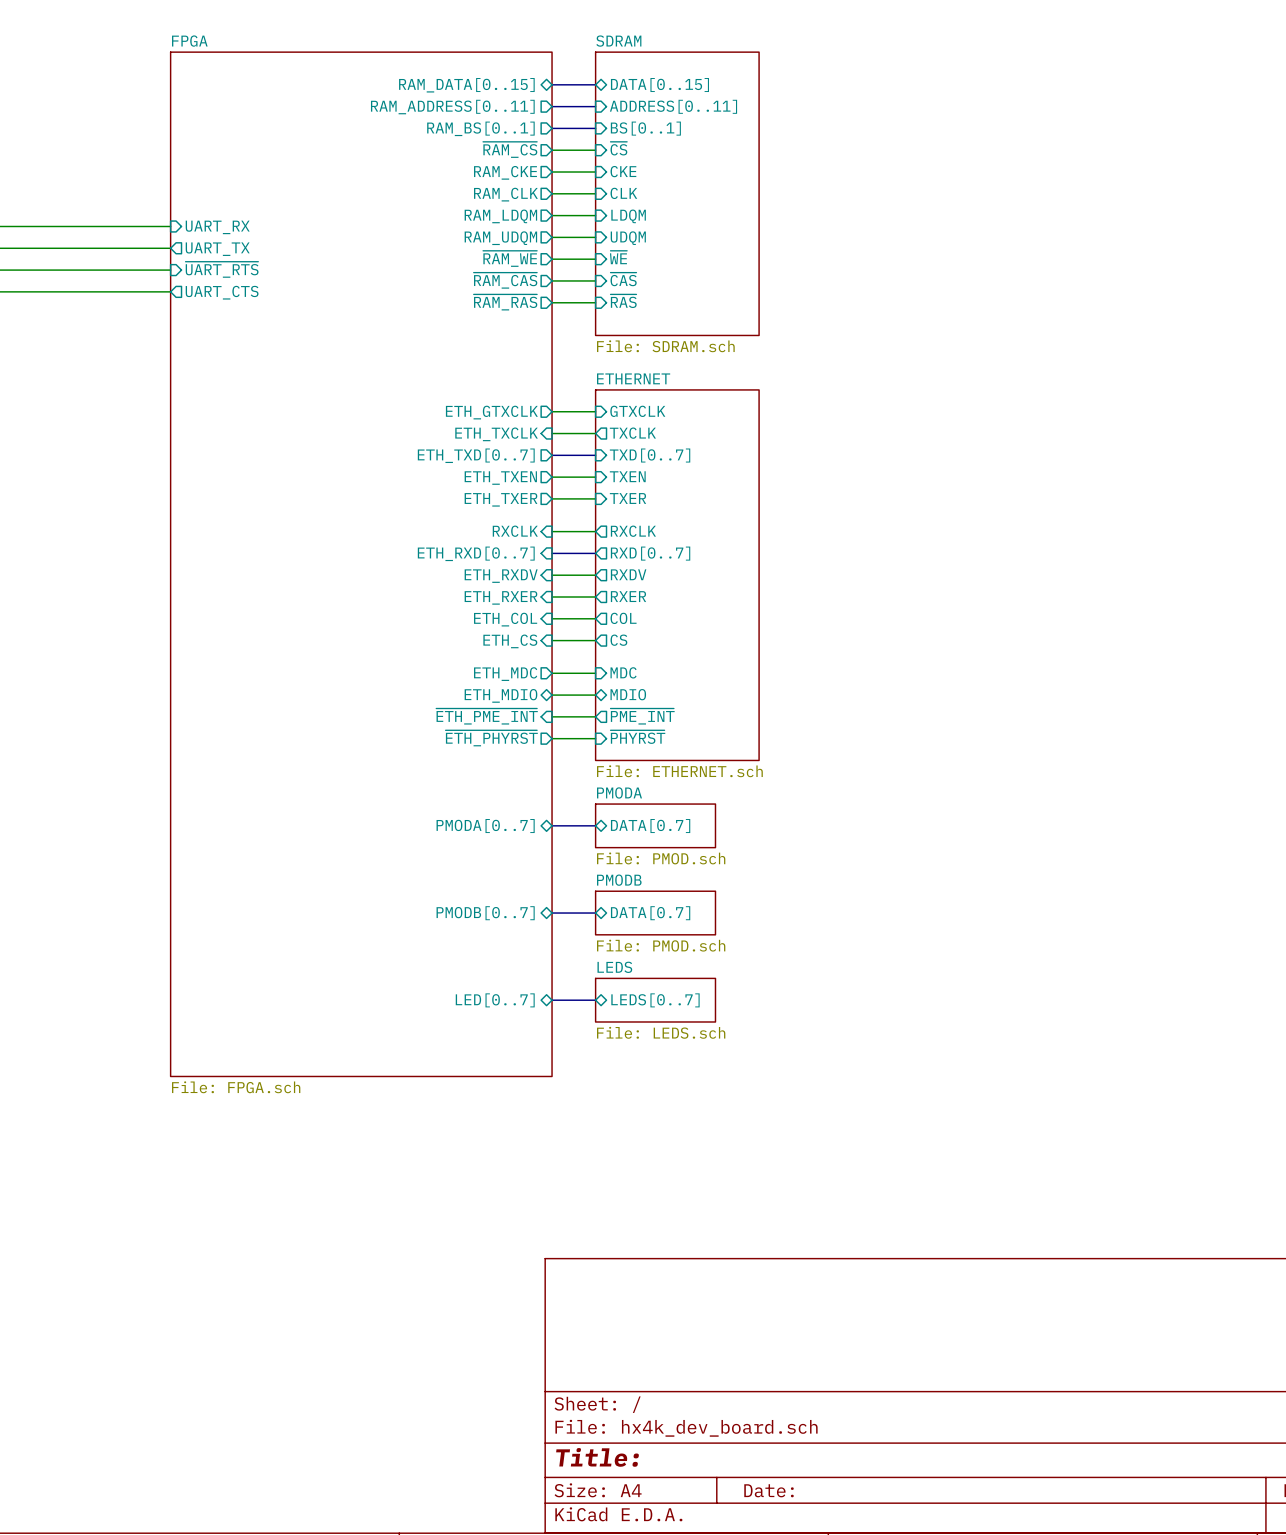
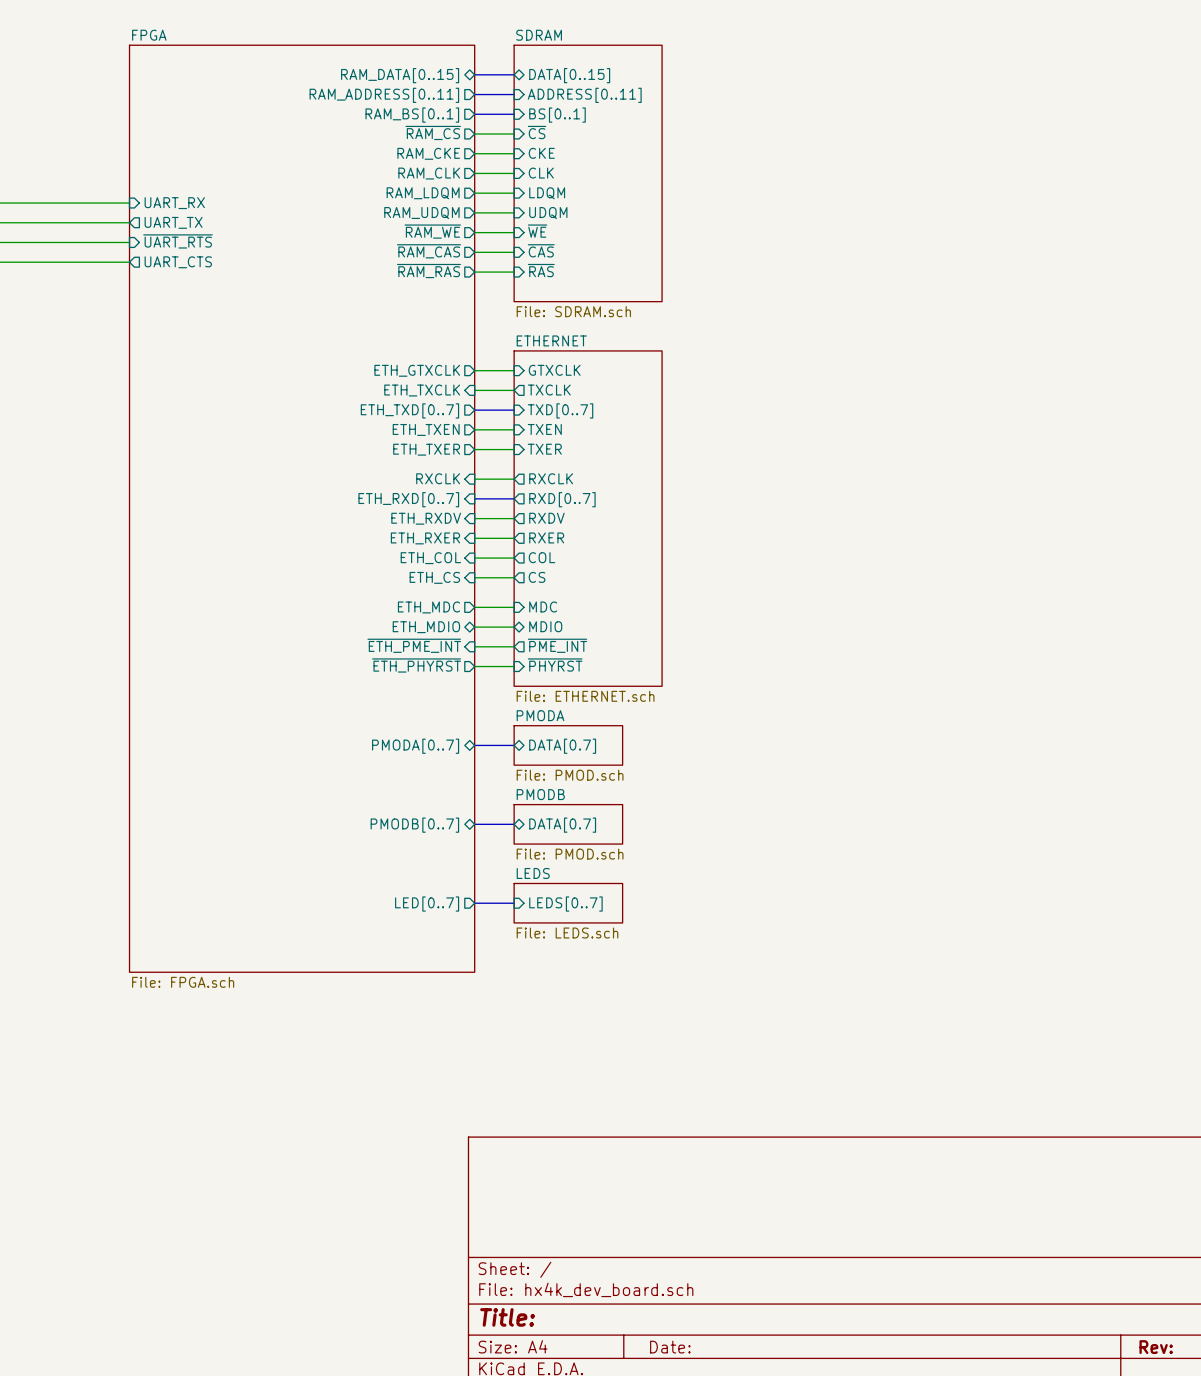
sheet pin shape: bidirectional (495, 1000) -> output (427, 904)
sheet pin shape: bidirectional (655, 1000) -> input (565, 904)

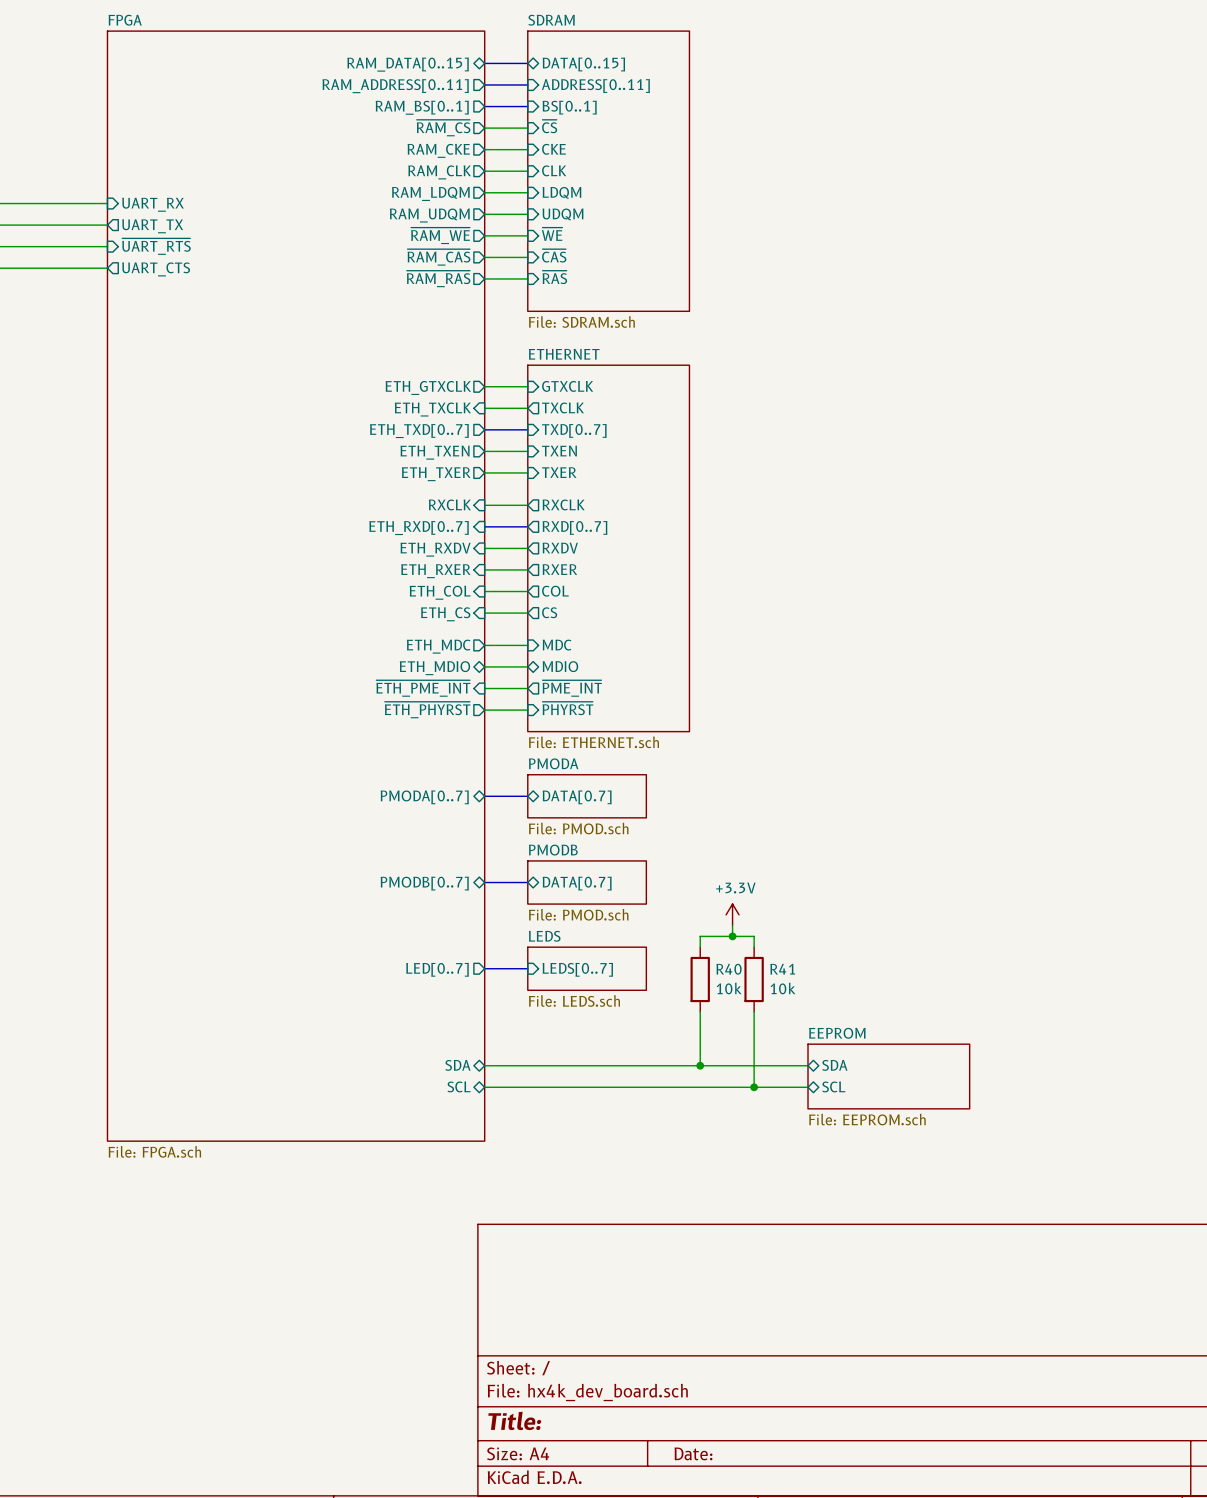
sheet FPGA: File: FPGA.sch (302, 508) -> none
sheet FPGA: none -> File: FPGA.sch (296, 586)
power symbol: none -> +3.3V (732, 914)
wire: none -> (732, 925) (732, 936)
junction: none -> (732, 936)
wire: none -> (700, 947) (700, 936) (754, 936) (754, 947)
R40: none -> 10k (700, 979)
R41: none -> 10k (754, 979)
wire: none -> (700, 1011) (700, 1065)
wire: none -> (754, 1011) (754, 1087)
sheet pin: none -> SDA (457, 1065)
wire: none -> (484, 1065) (808, 1065)
junction: none -> (700, 1065)
sheet pin: none -> SDA (834, 1065)
sheet EEPROM: none -> File: EEPROM.sch (888, 1076)
sheet pin: none -> SCL (459, 1086)
wire: none -> (484, 1087) (808, 1087)
junction: none -> (754, 1087)
sheet pin: none -> SCL (833, 1086)

